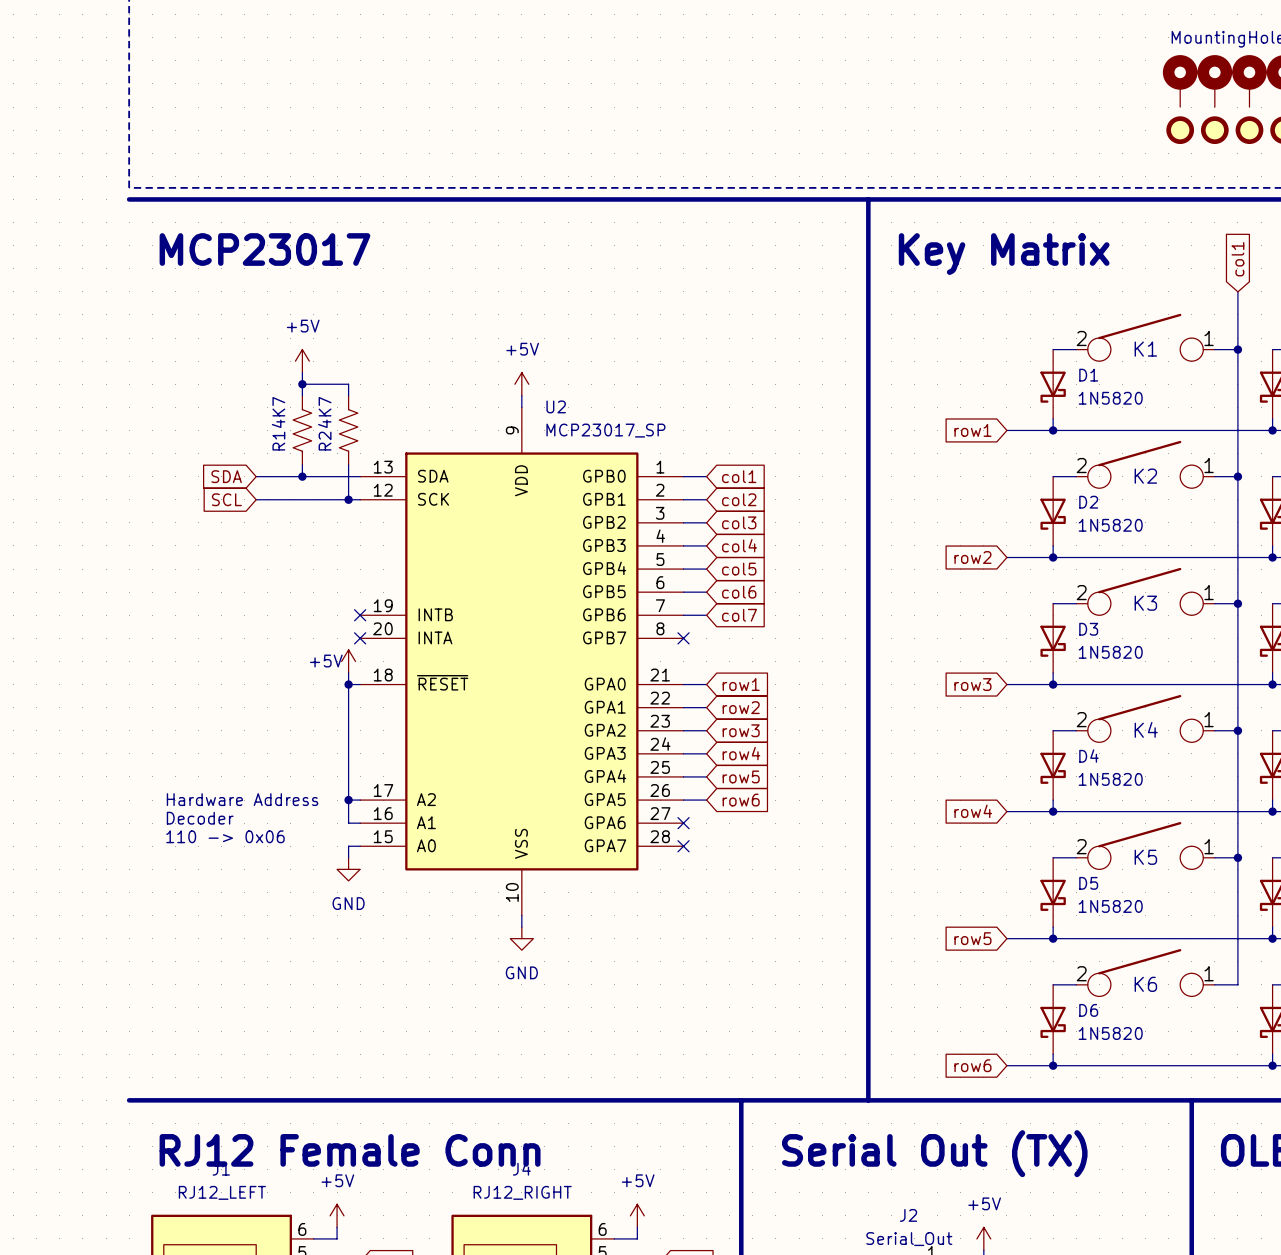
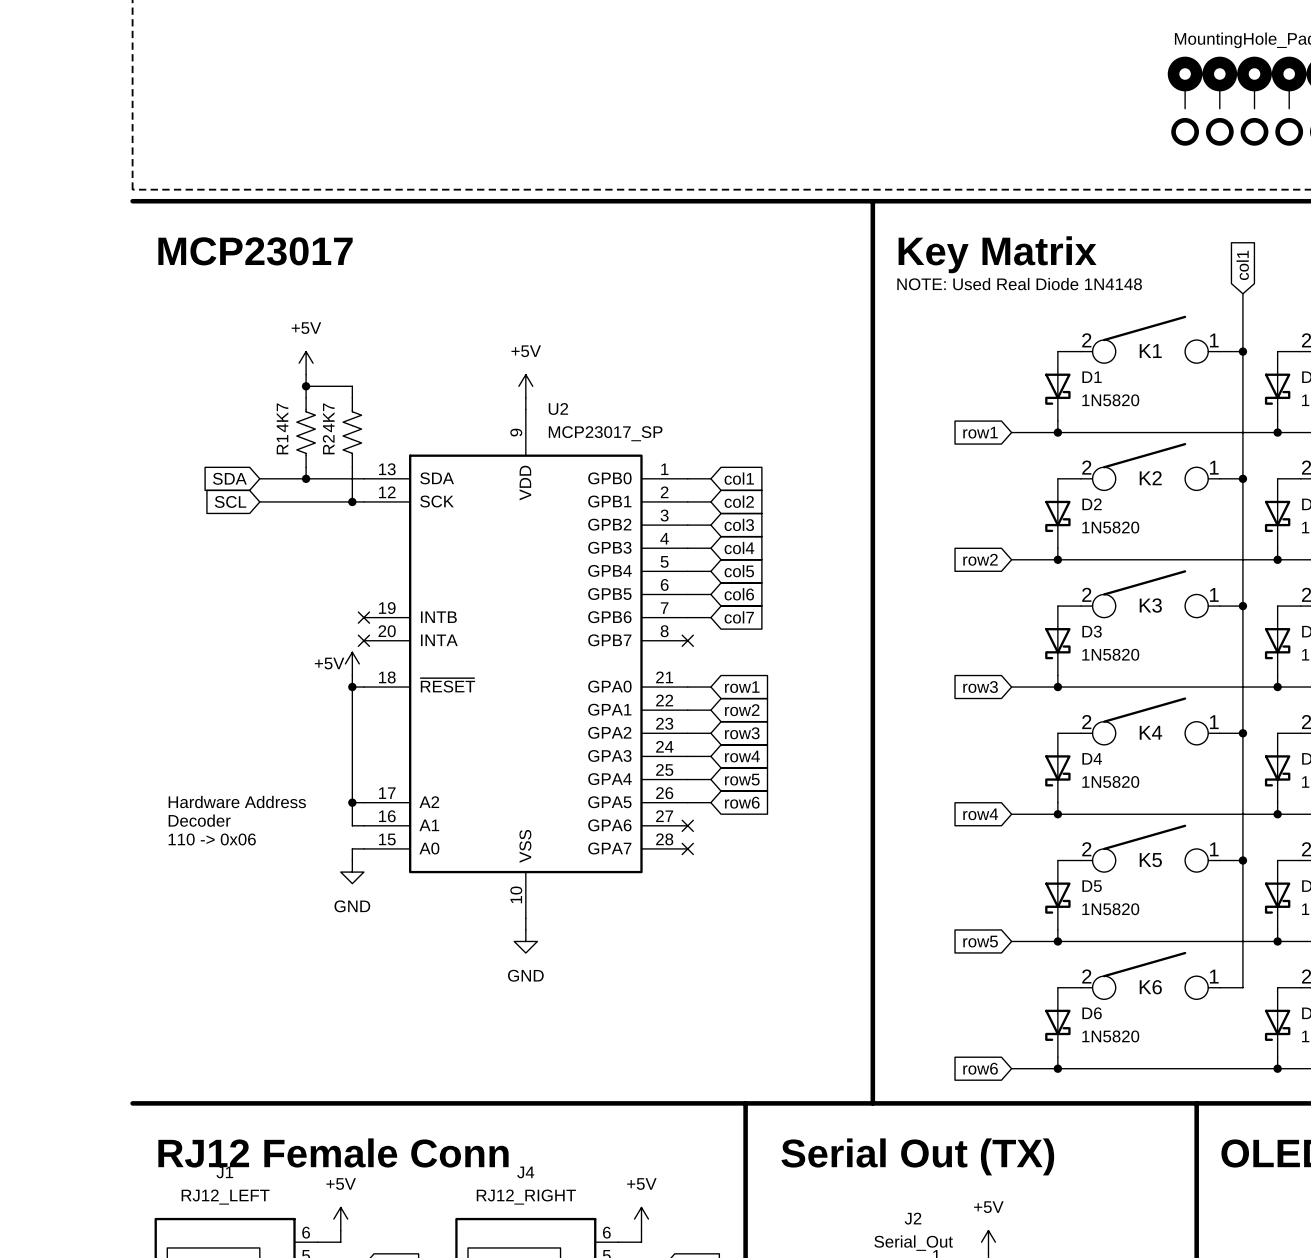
text: none -> NOTE: Used Real Diode 1N4148 (1019, 284)

